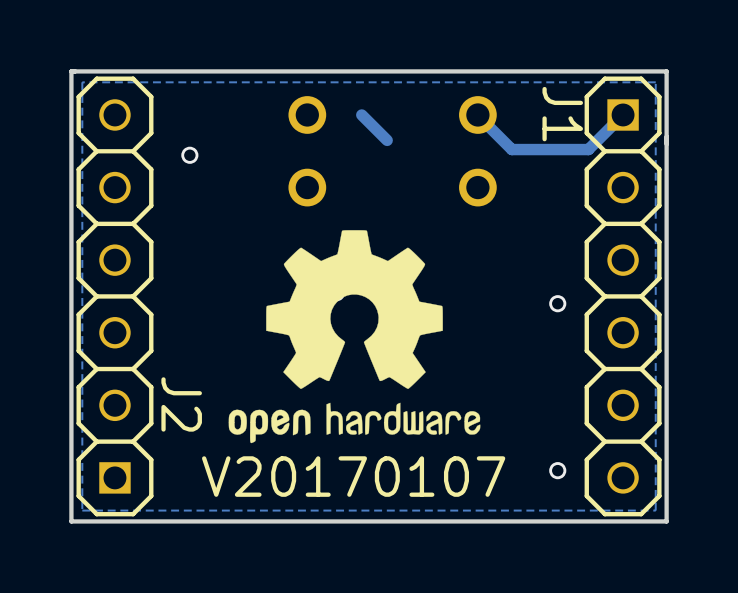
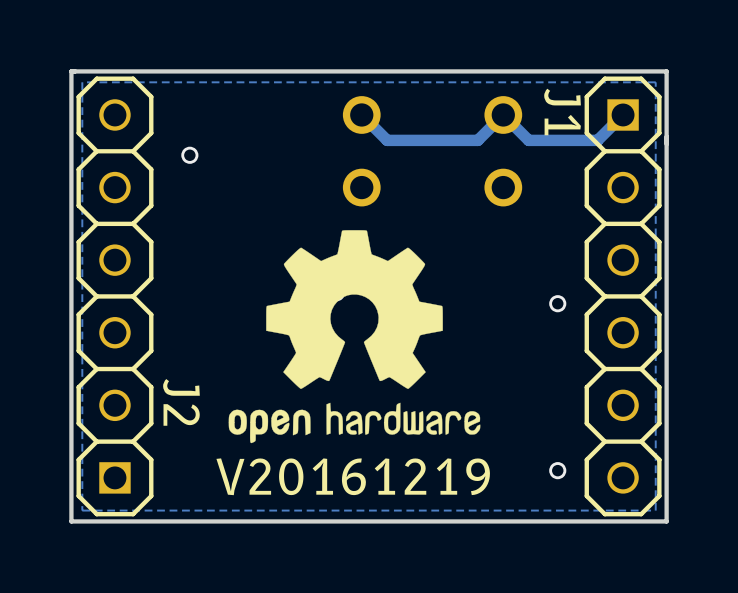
track: (478, 116) (511, 149) (588, 149) (597, 140) -> (387, 140) (477, 140) (503, 114) (528, 140) (597, 140)
part position: (307, 151) -> (361, 151)
part position: (477, 151) -> (503, 151)
text: V20170107 (353, 476) -> V20161219 (353, 476)

